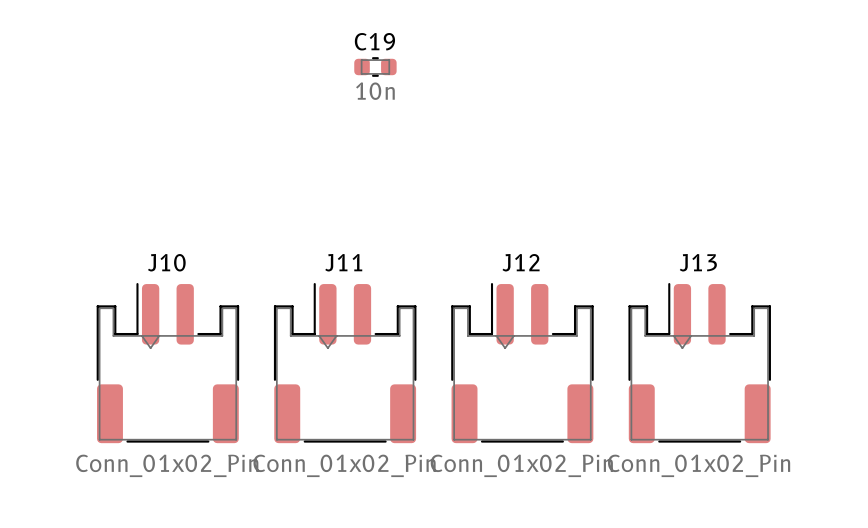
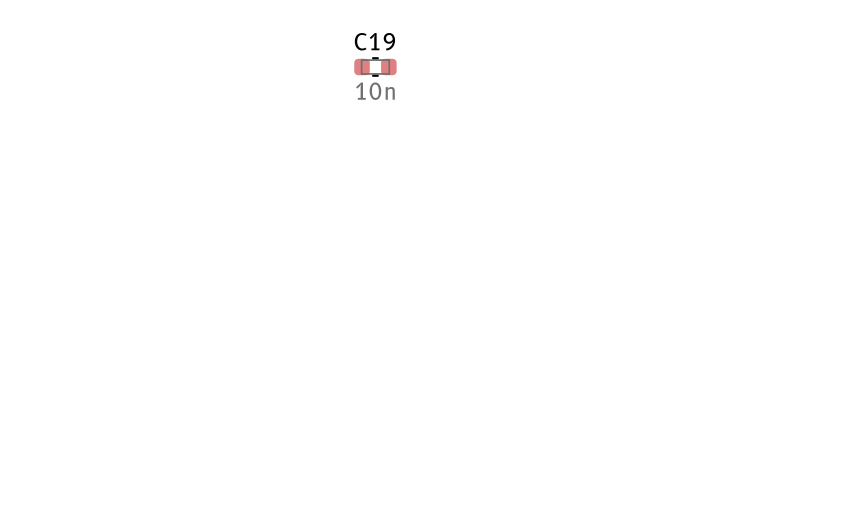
J10: Conn_01x02_Pin (167, 363) -> none
J11: Conn_01x02_Pin (345, 363) -> none
J12: Conn_01x02_Pin (522, 363) -> none
J13: Conn_01x02_Pin (699, 363) -> none

